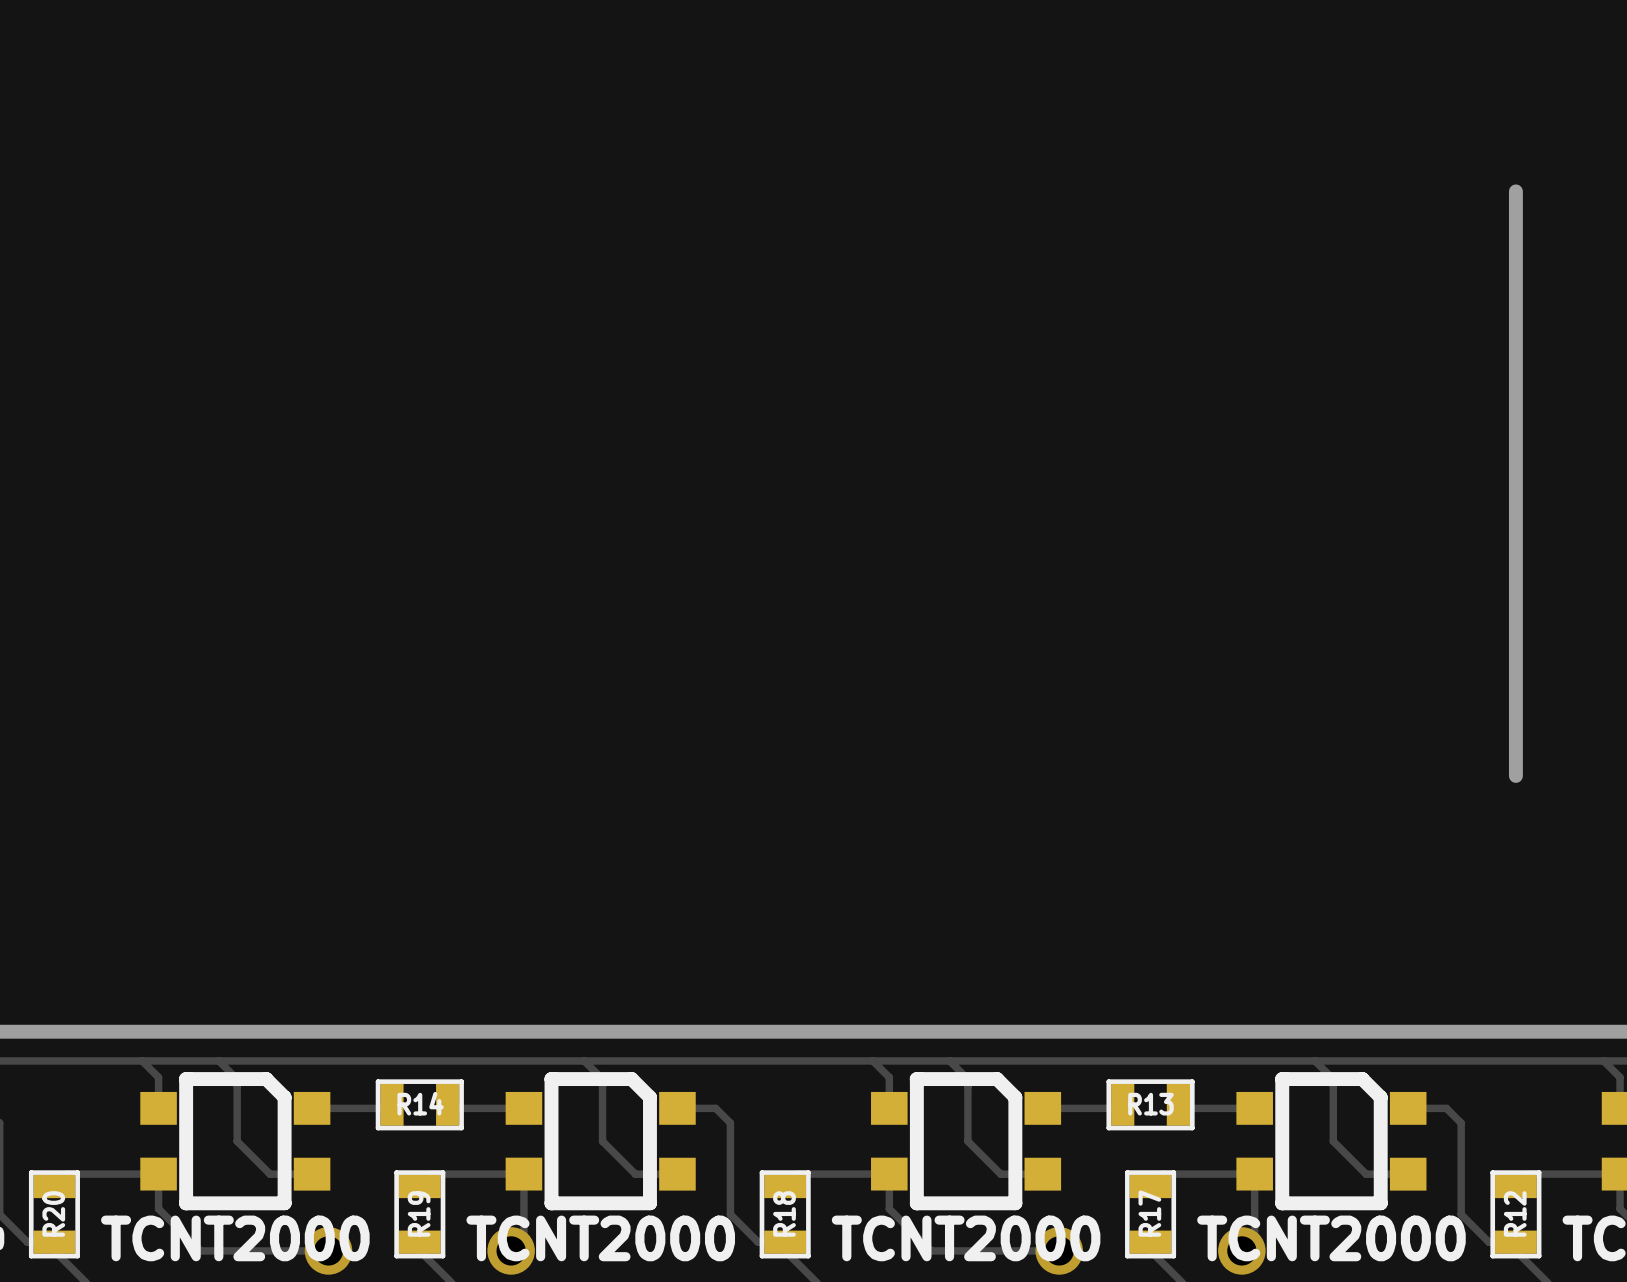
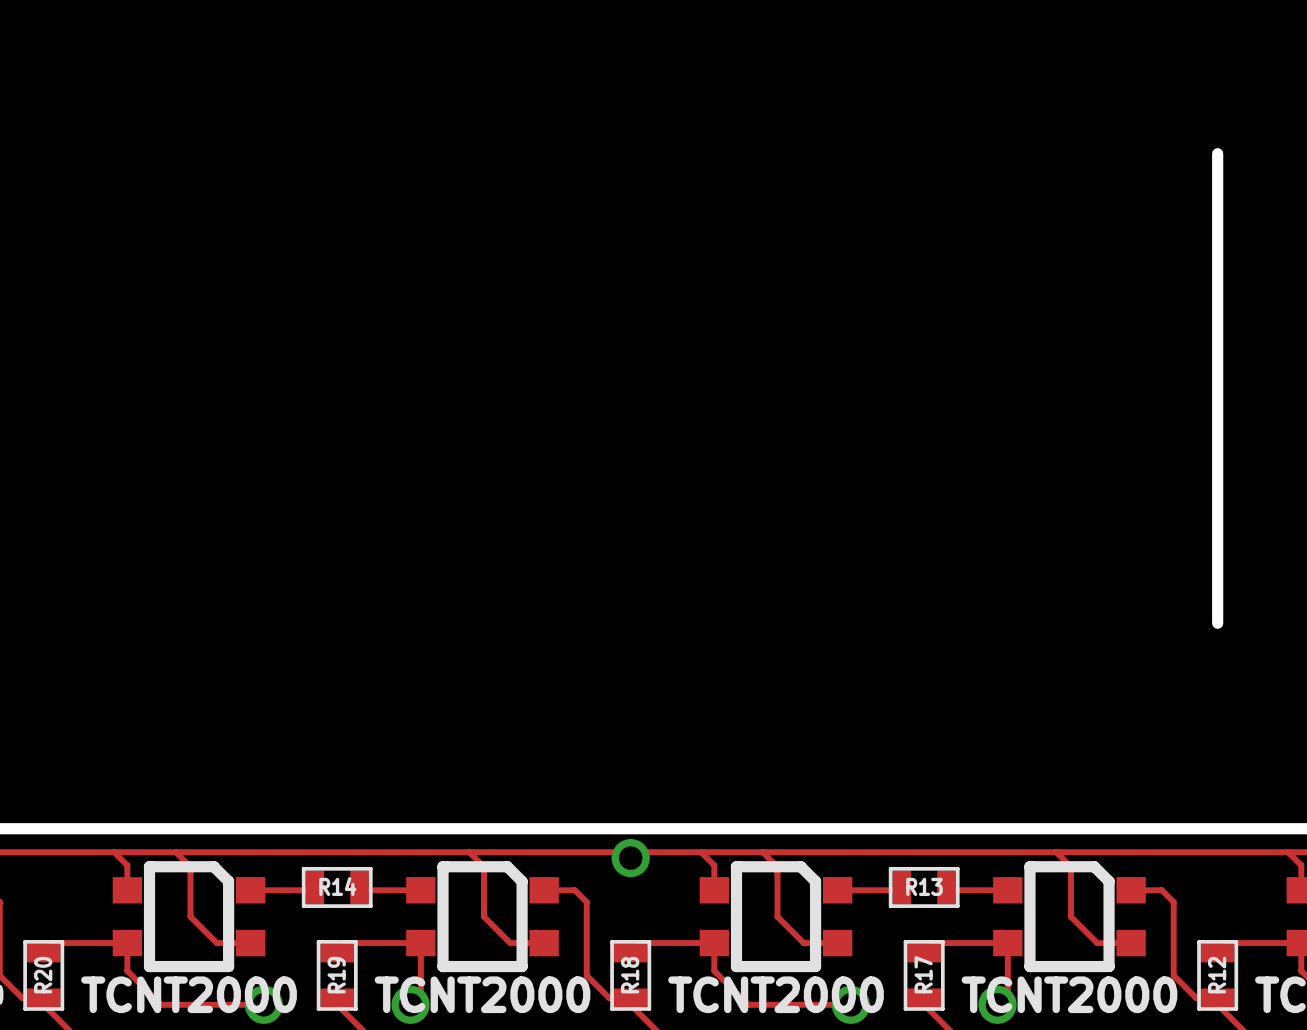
via: none -> (630, 858)

